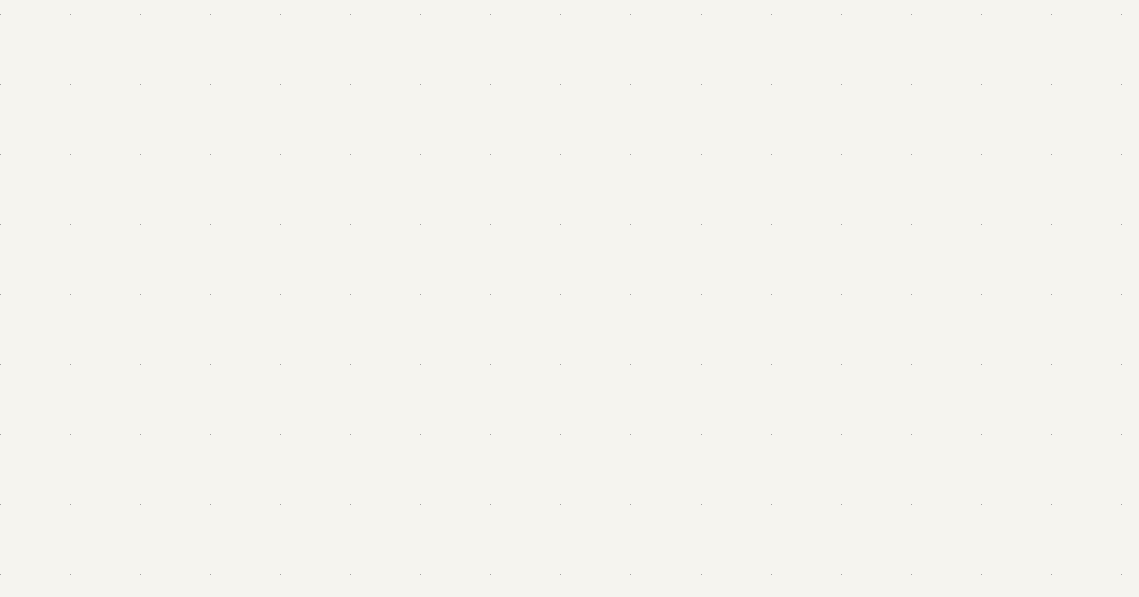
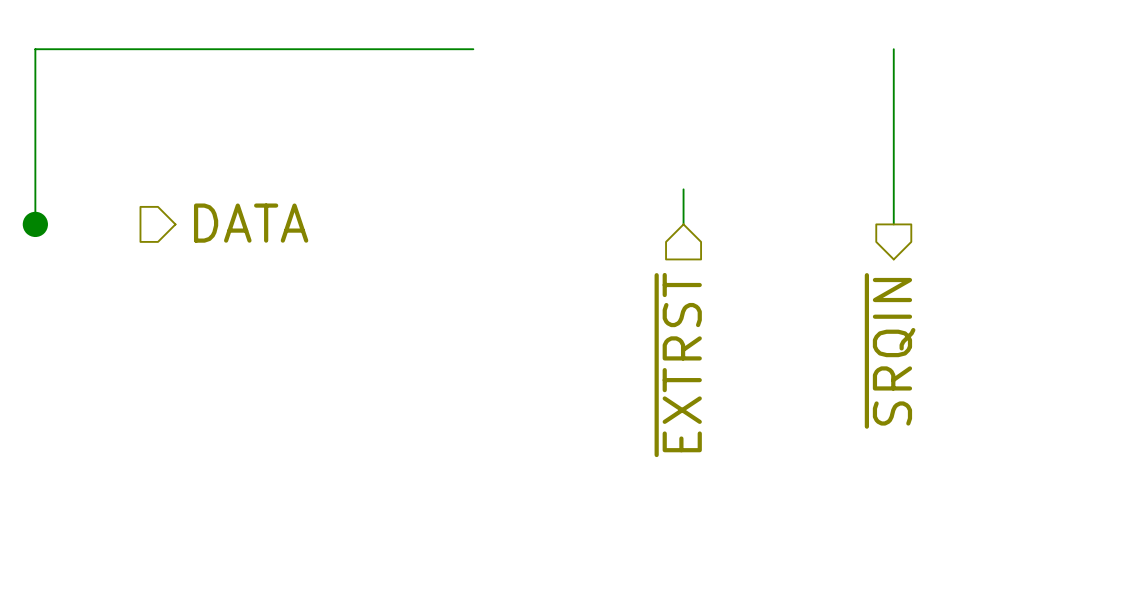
wire: none -> (473, 49) (35, 49) (35, 224)
wire: none -> (893, 49) (893, 224)
wire: none -> (683, 189) (683, 224)
hierarchical label: none -> DATA (251, 223)
junction: none -> (35, 224)
hierarchical label: none -> ~{SRQIN} (890, 350)
hierarchical label: none -> ~{EXTRST} (678, 365)

